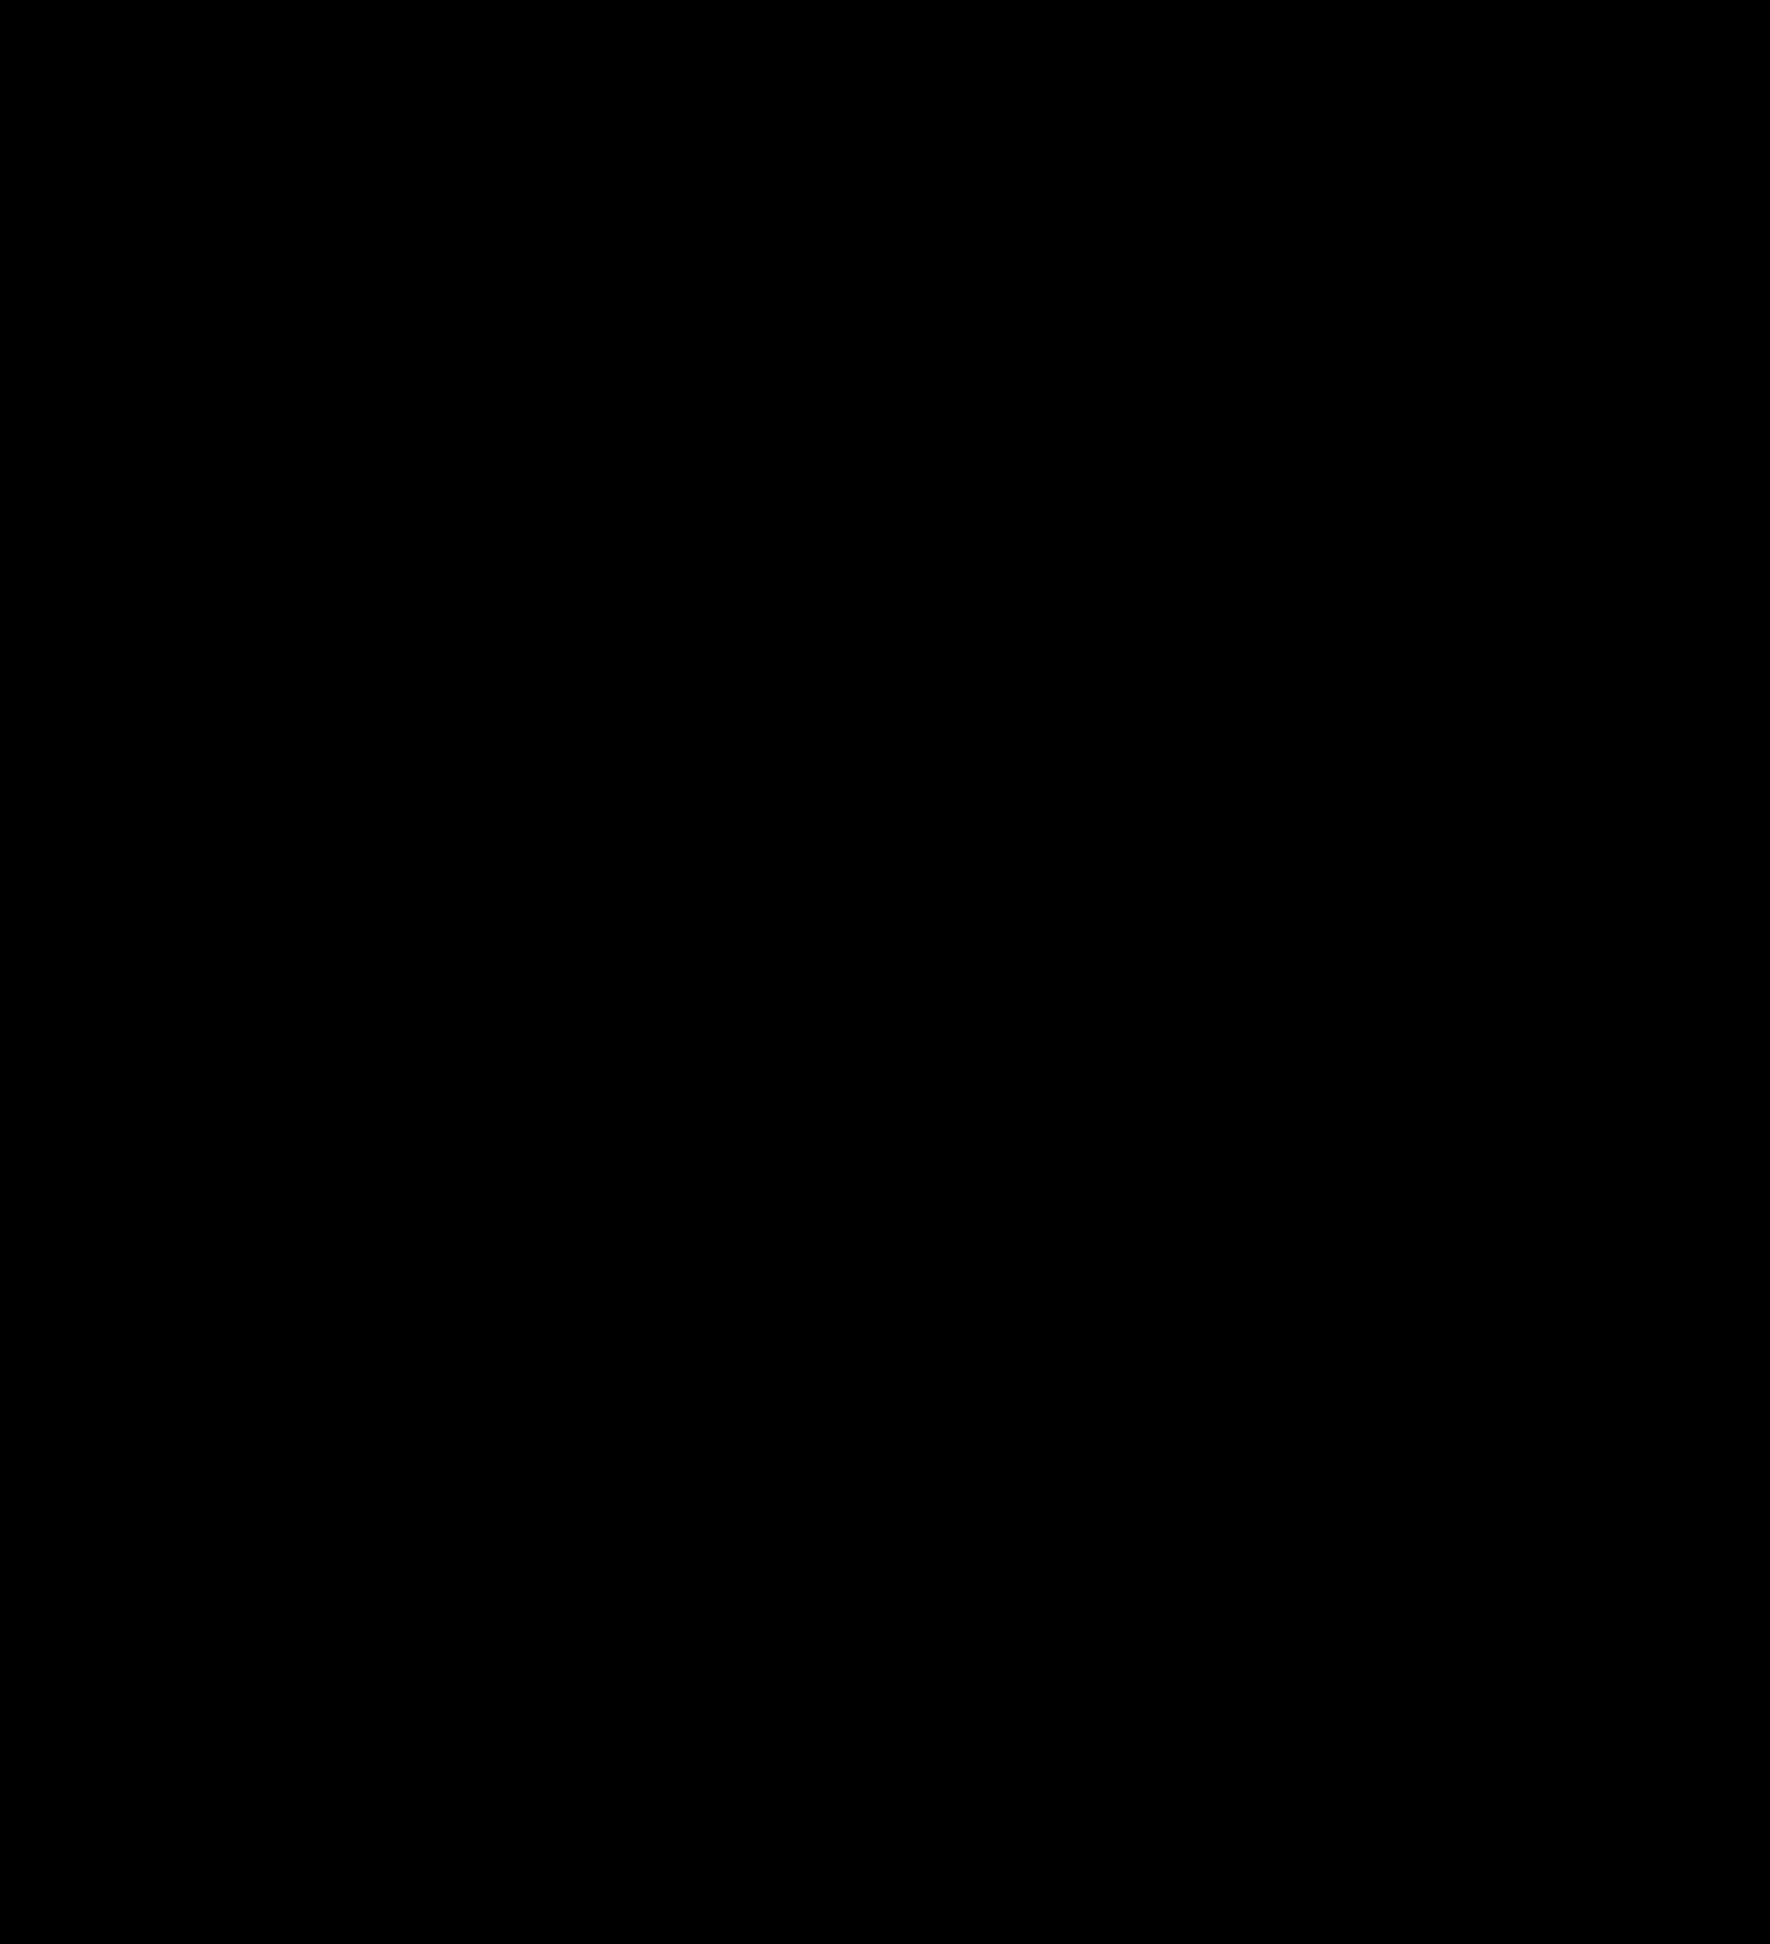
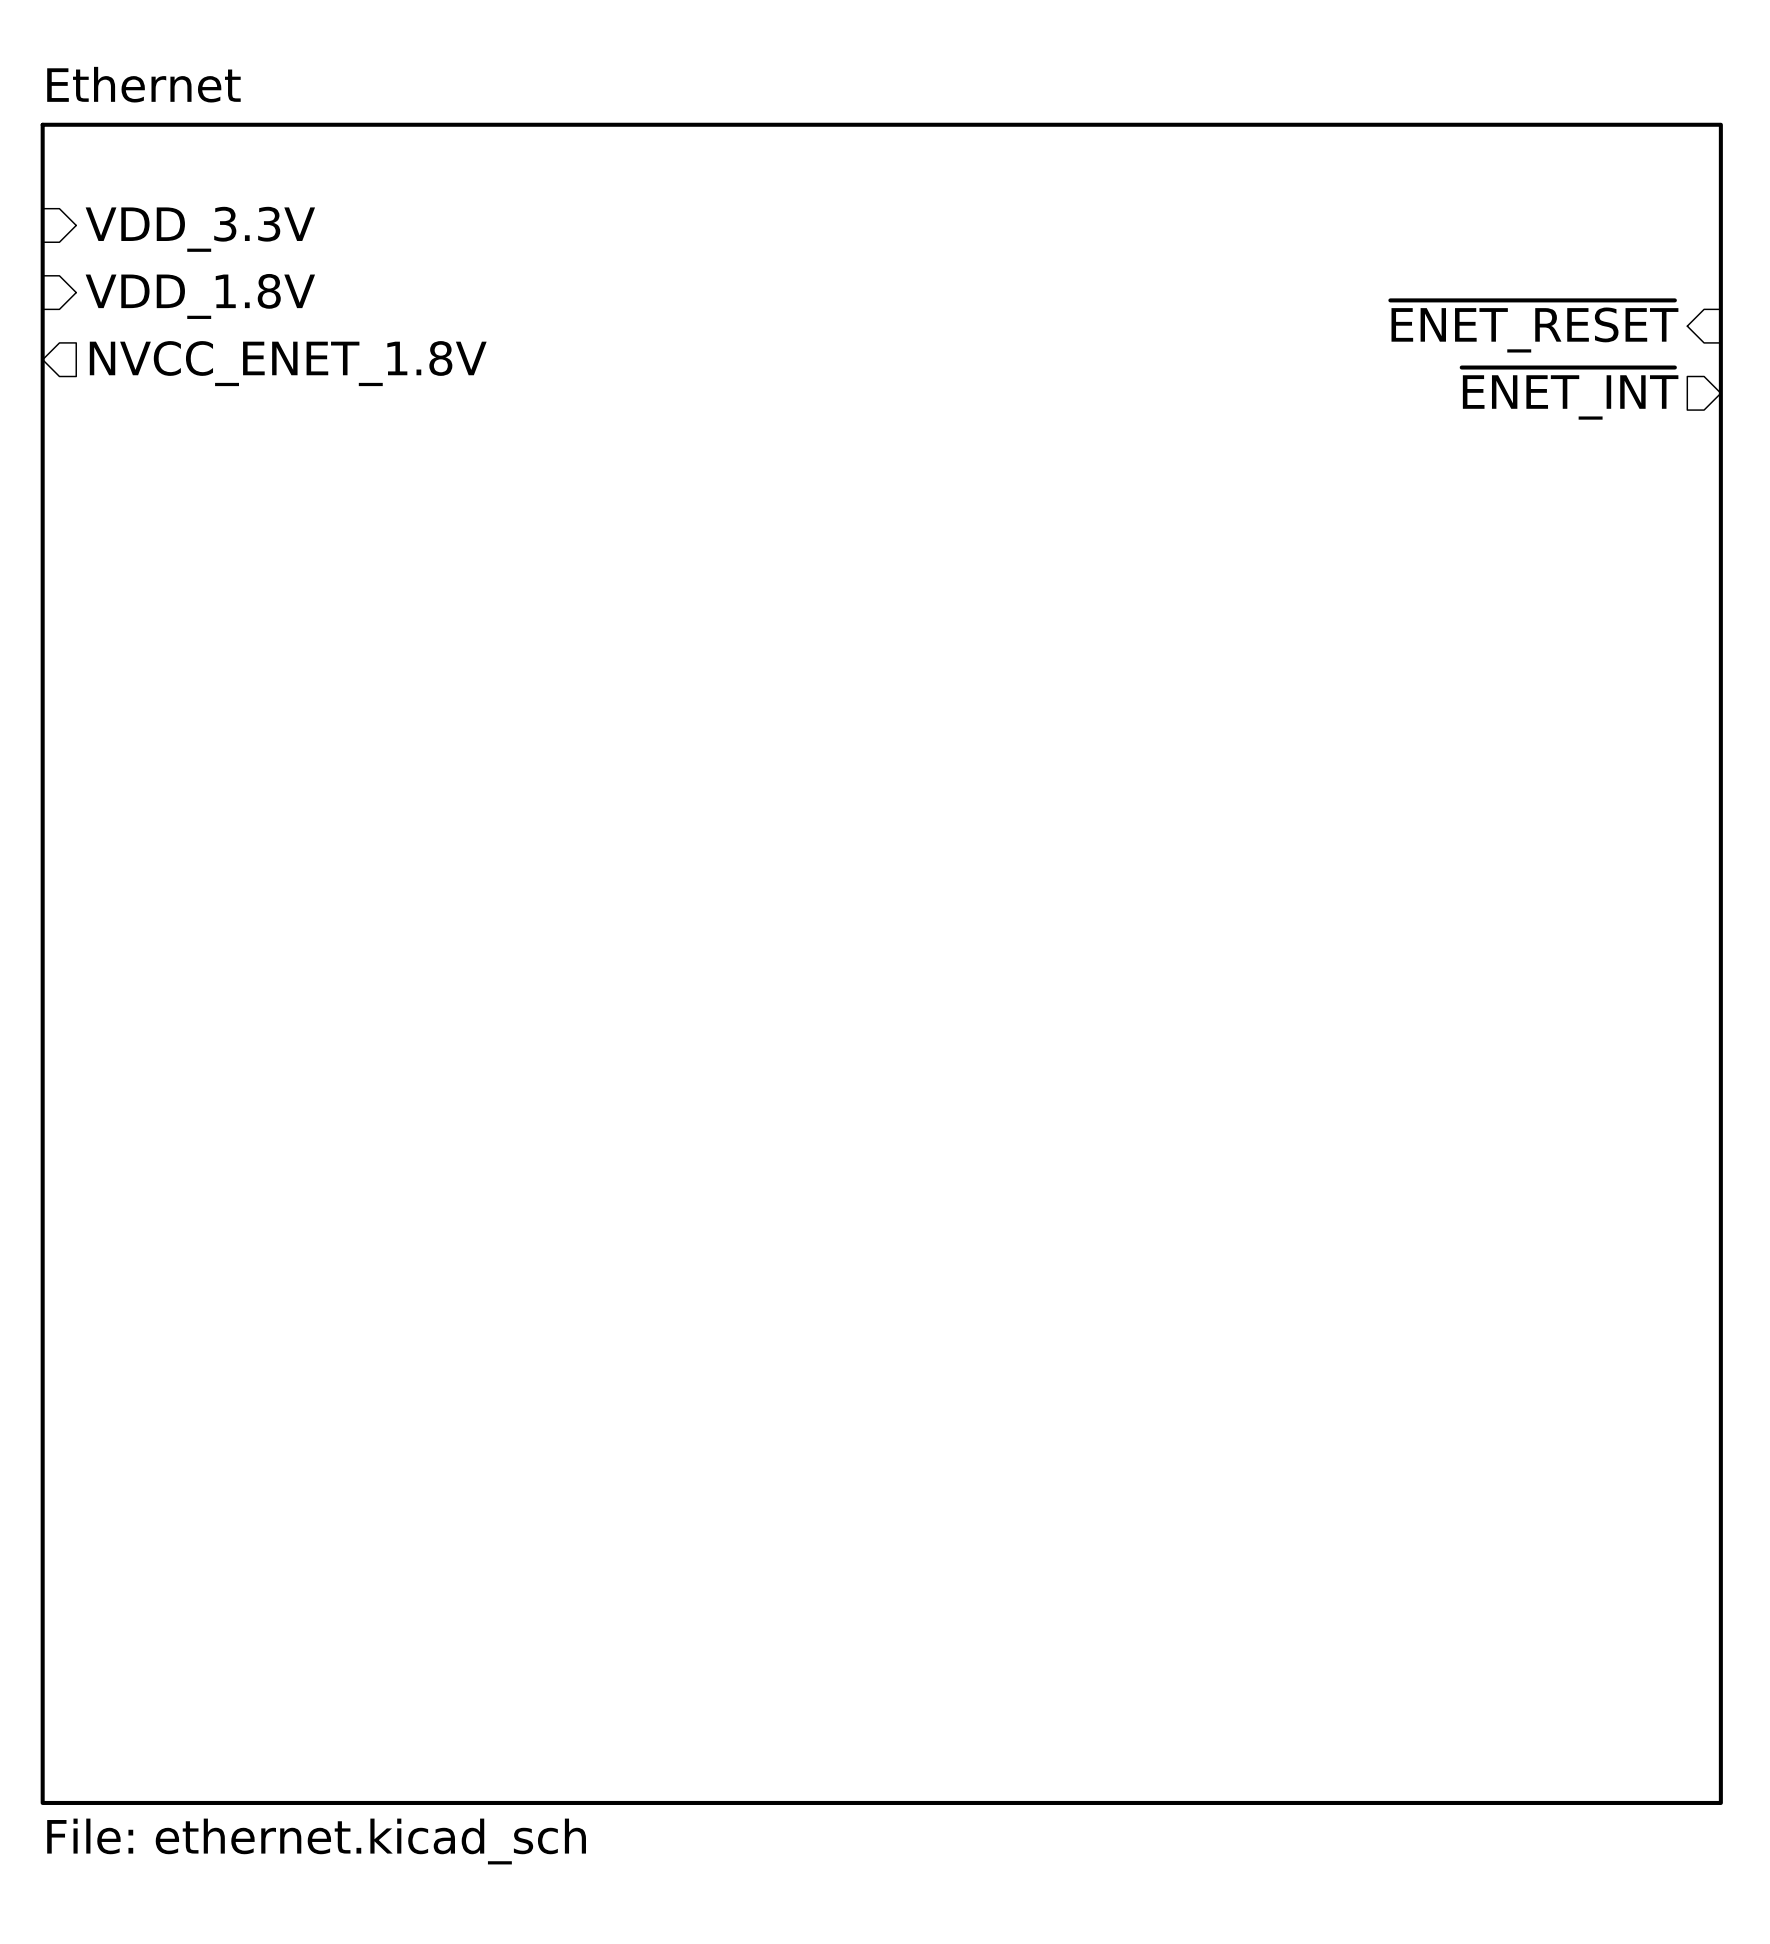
sheet pin: none -> VDD_3.3V (200, 229)
sheet pin: none -> VDD_1.8V (200, 296)
sheet pin: none -> ~{ENET_RESET} (1534, 326)
sheet pin: none -> NVCC_ENET_1.8V (288, 363)
sheet pin: none -> ~{ENET_INT} (1570, 393)
sheet Ethernet: none -> File: ethernet.kicad_sch (881, 963)

